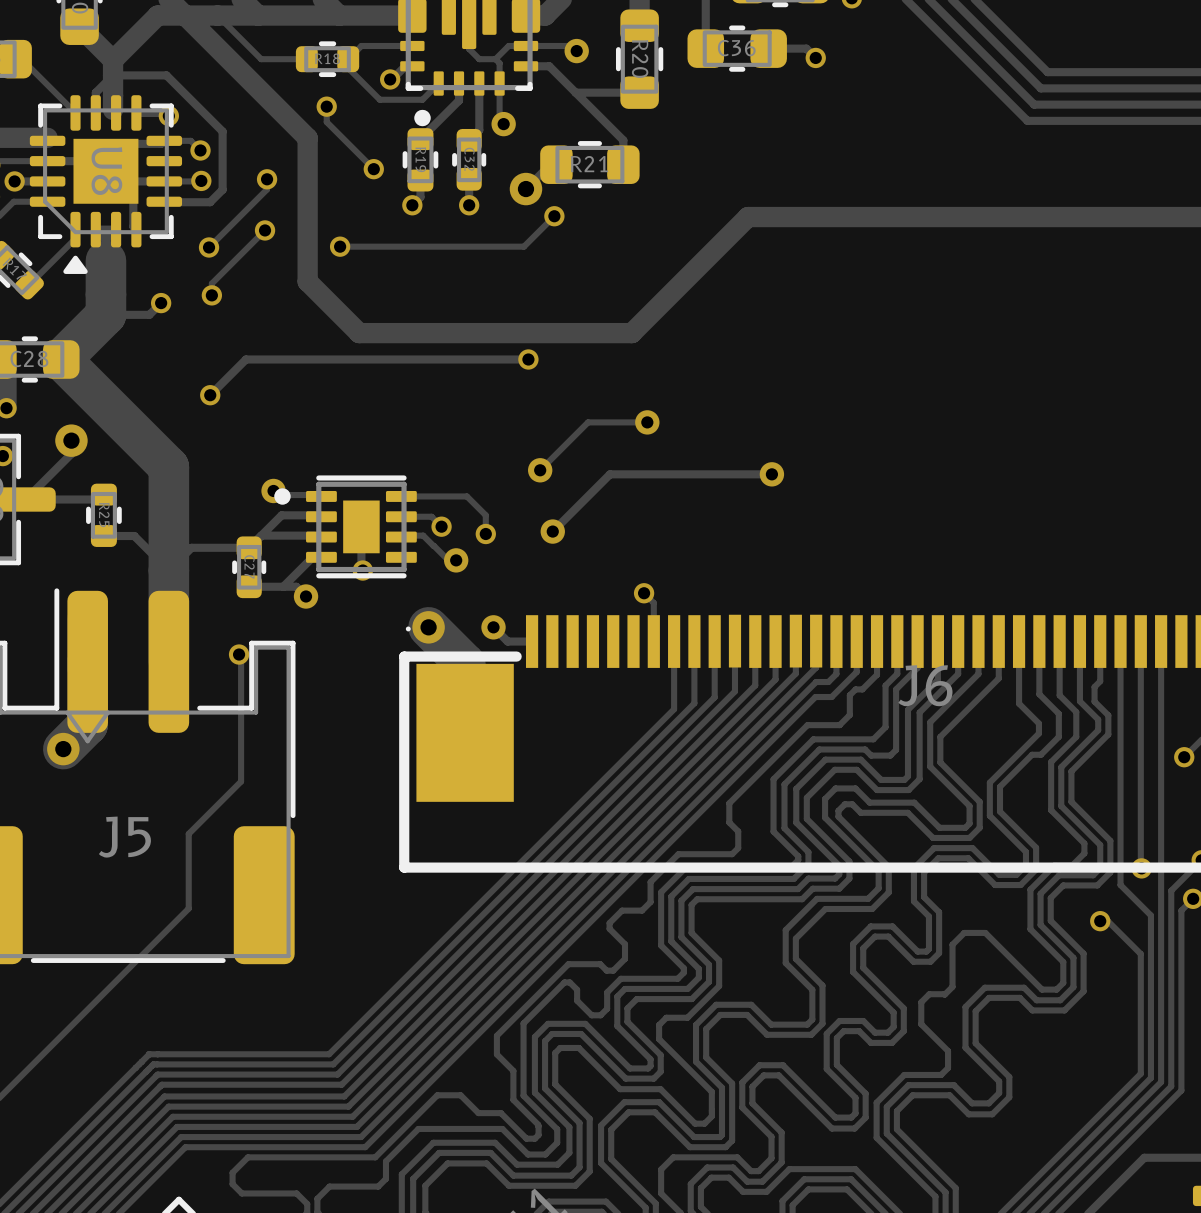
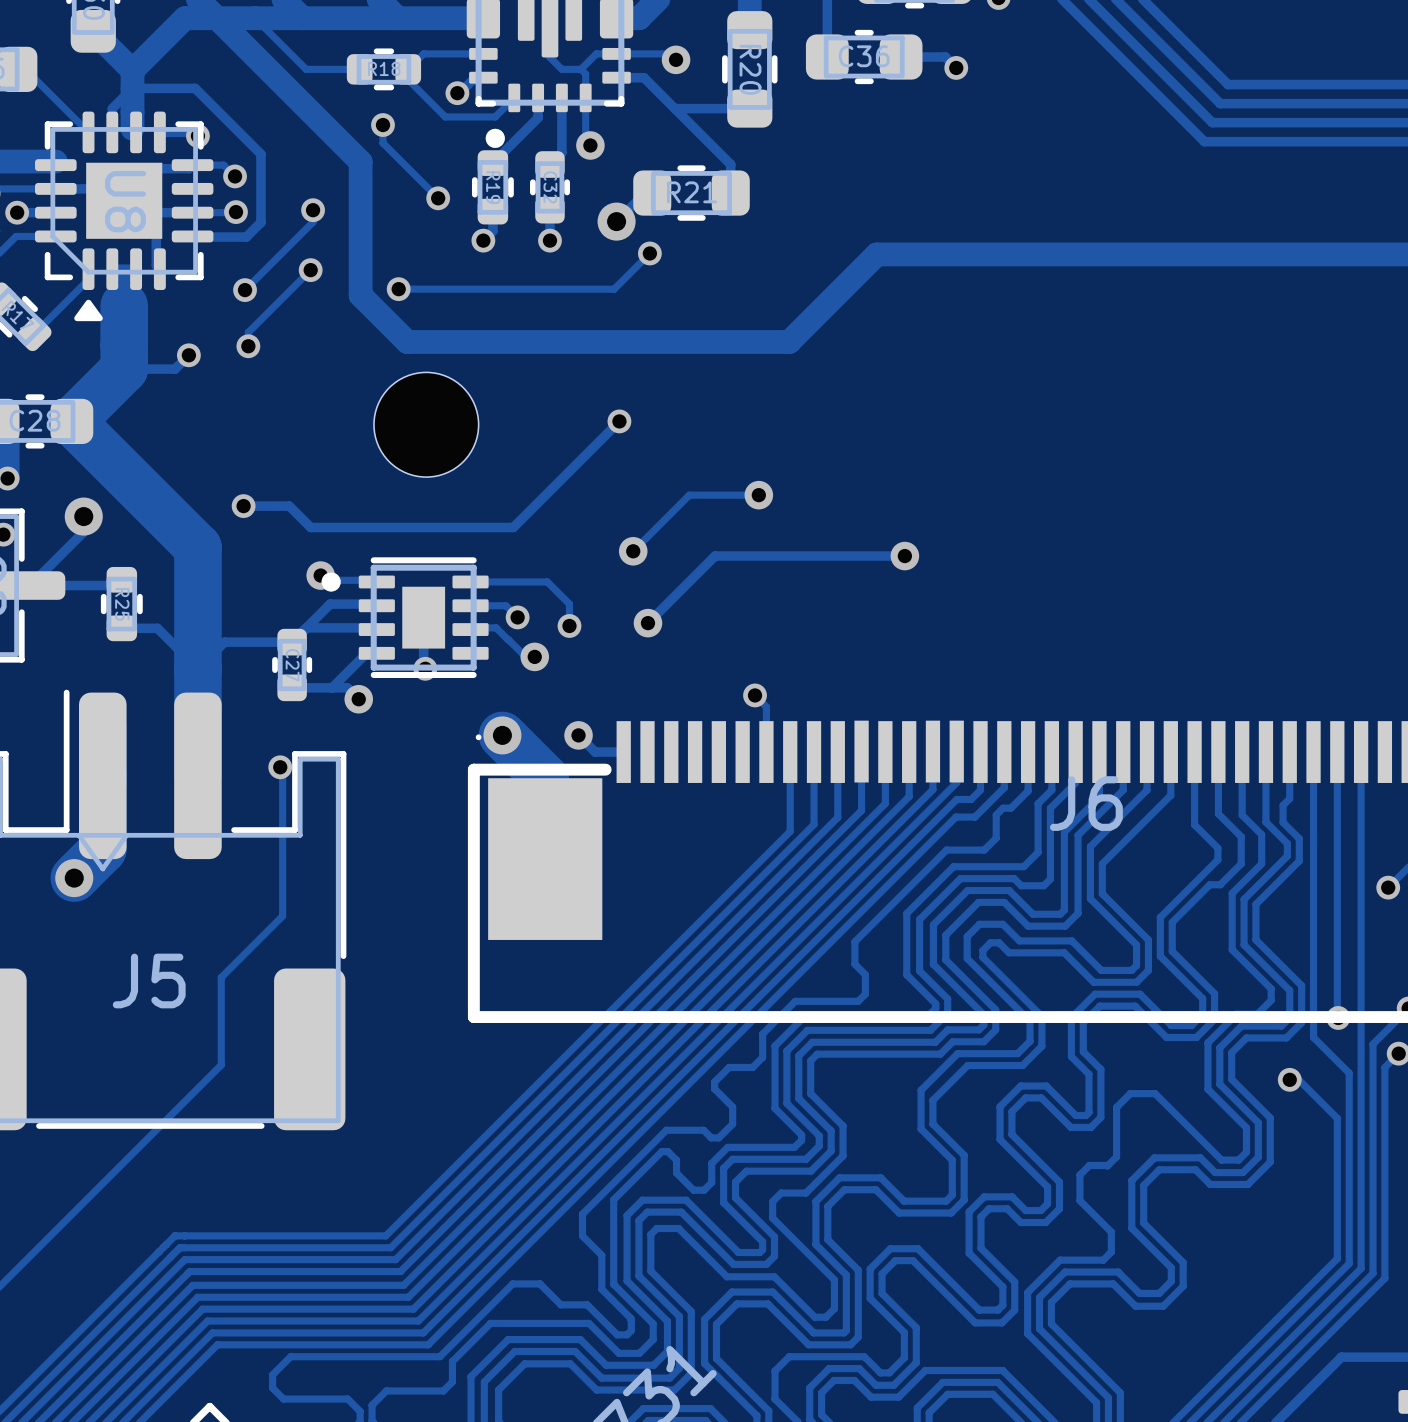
track: (307, 251) (307, 281) (359, 333) (631, 333) (673, 291) -> (360, 295) (407, 341) (789, 341)
track: (528, 359) (245, 359) (210, 395) -> (619, 421) (513, 527) (310, 527) (289, 506) (243, 506)
part: none -> (426, 424)
via position: (210, 395) -> (243, 506)

